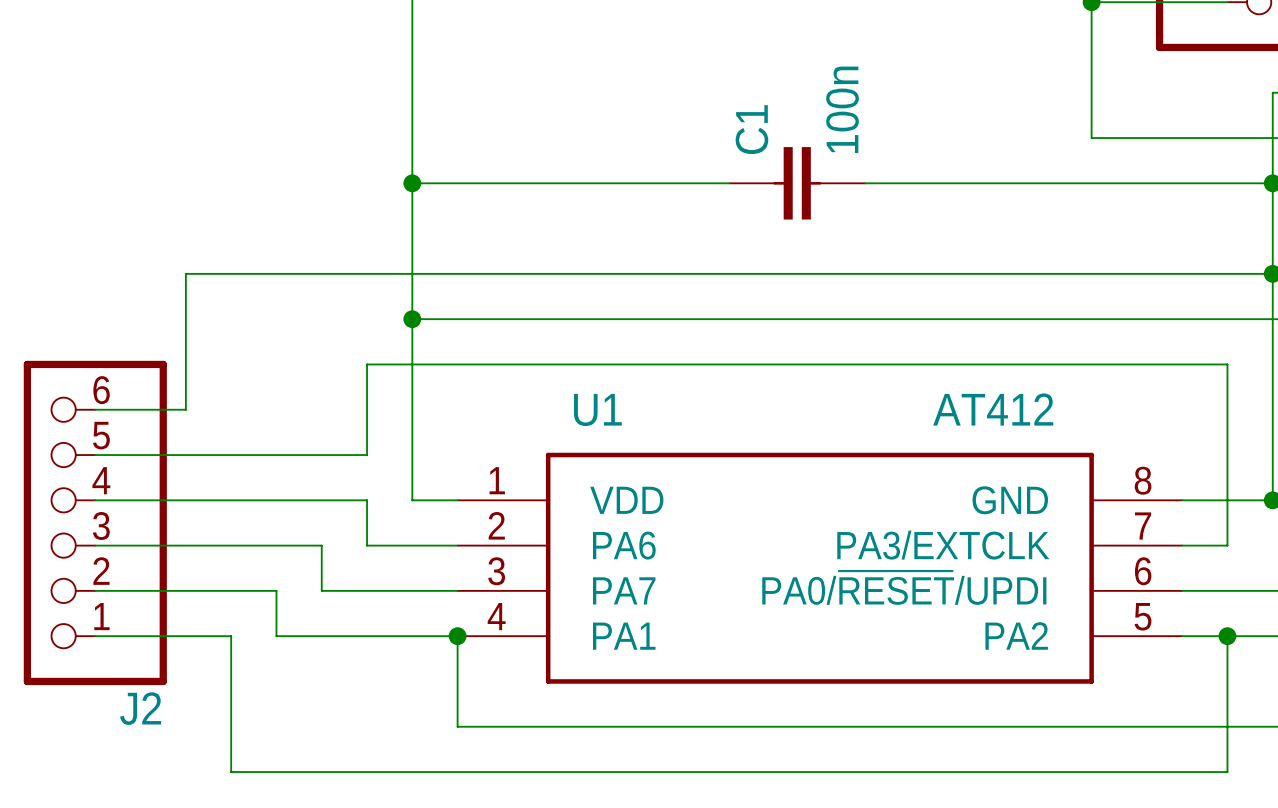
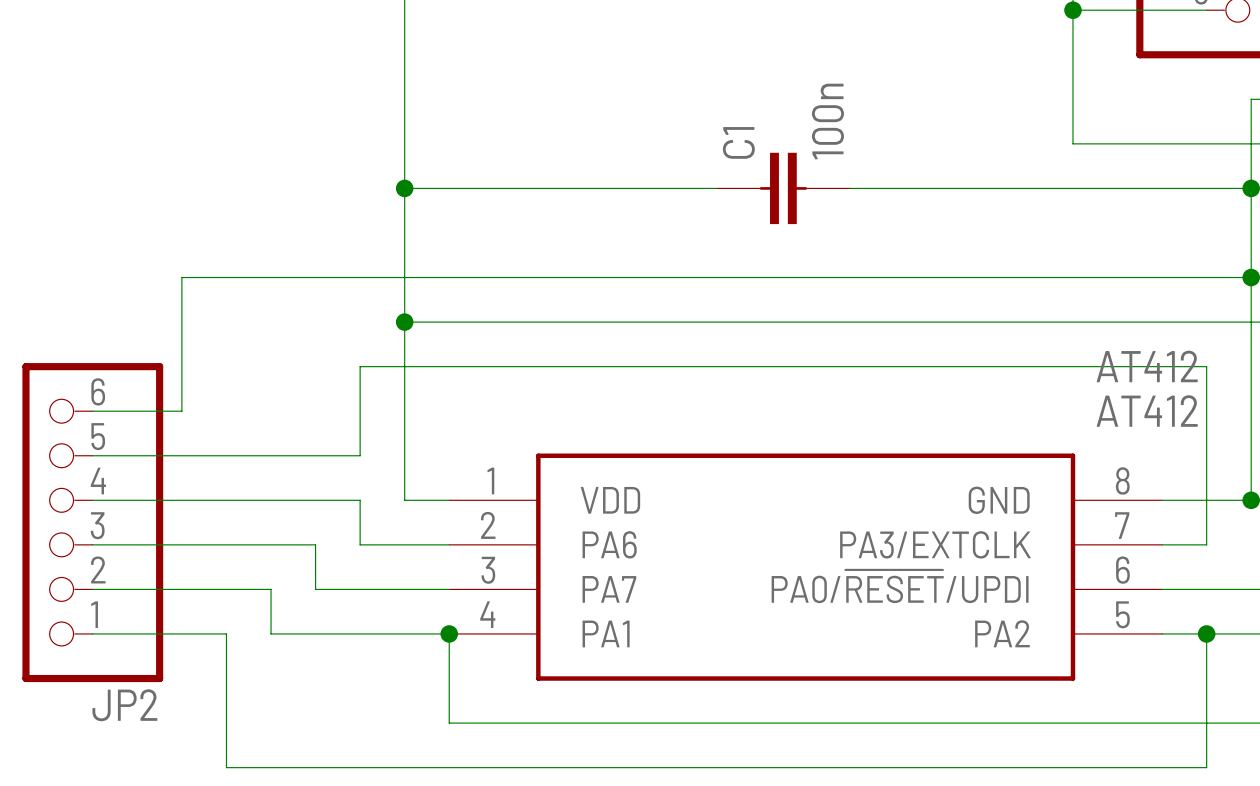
U1 name: U1 (597, 409) -> AT412 (1147, 366)
U1 value position: AT412 (993, 409) -> AT412 (1147, 411)
J2 name: J2 (140, 708) -> JP2 (124, 705)

